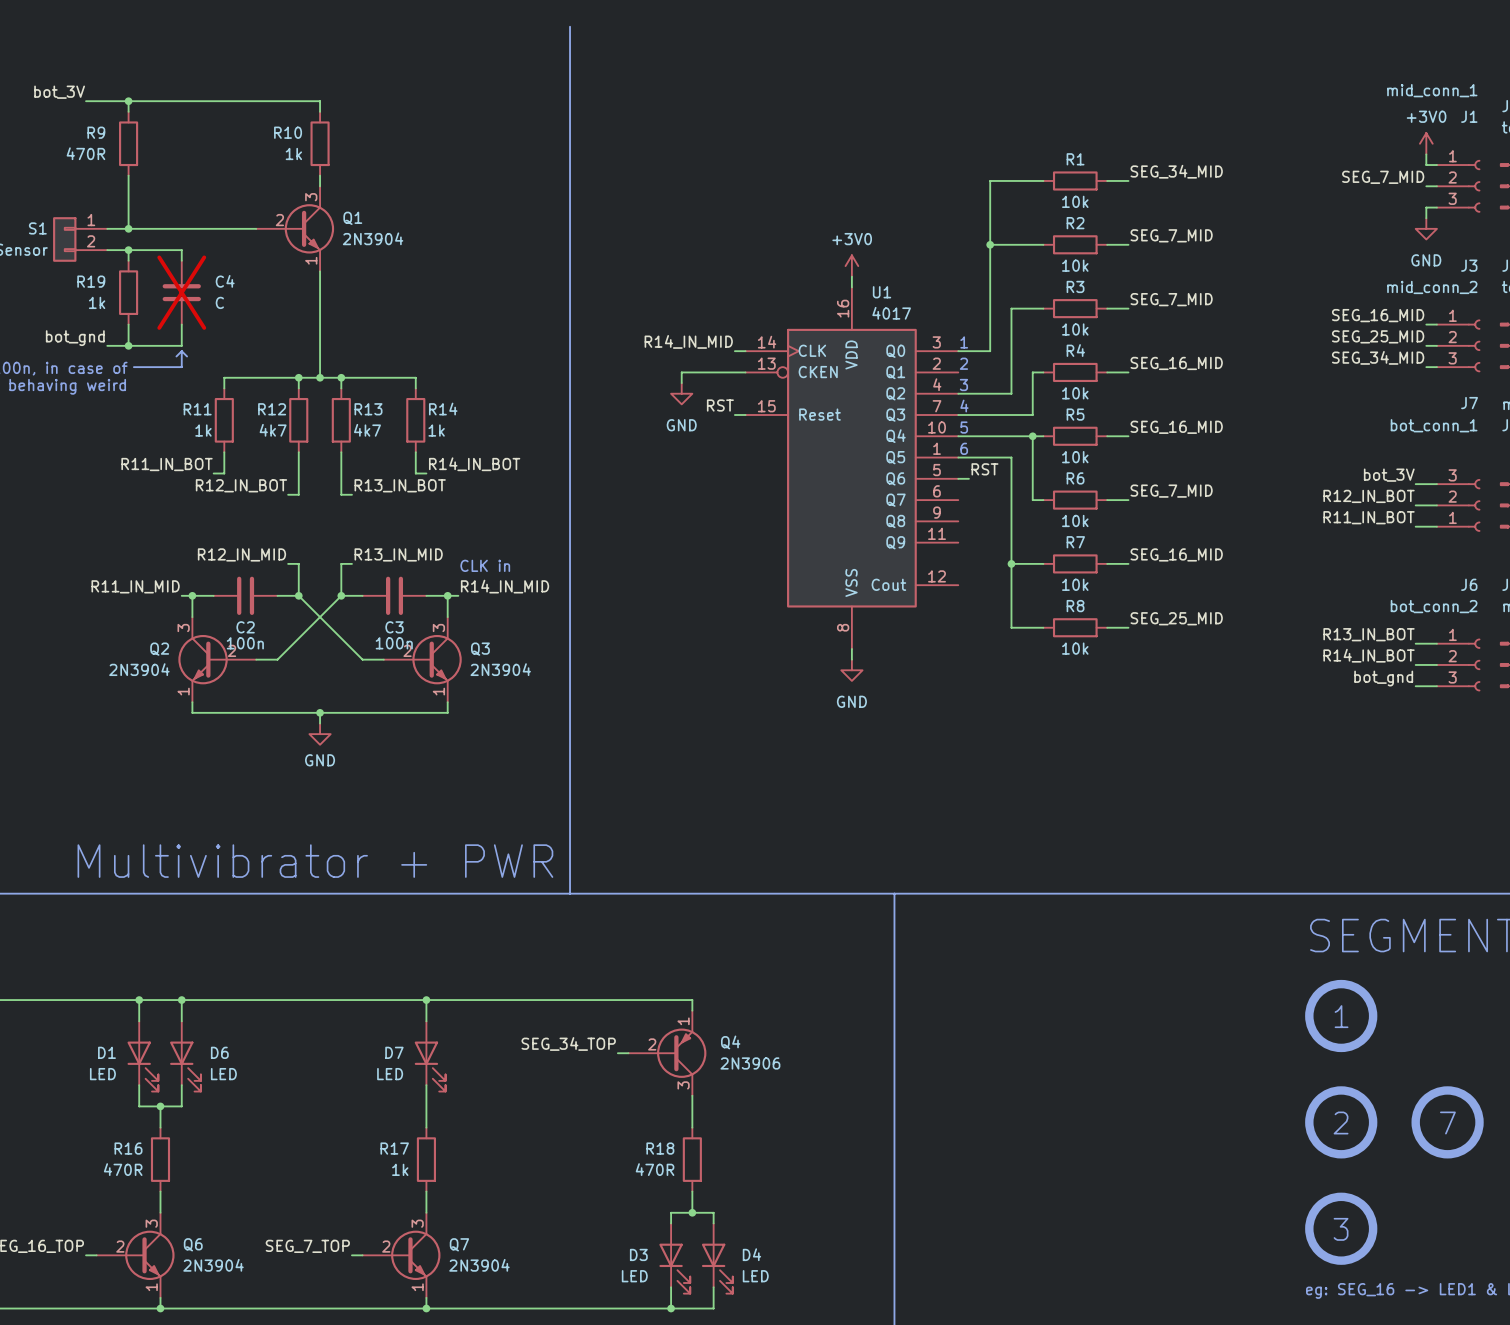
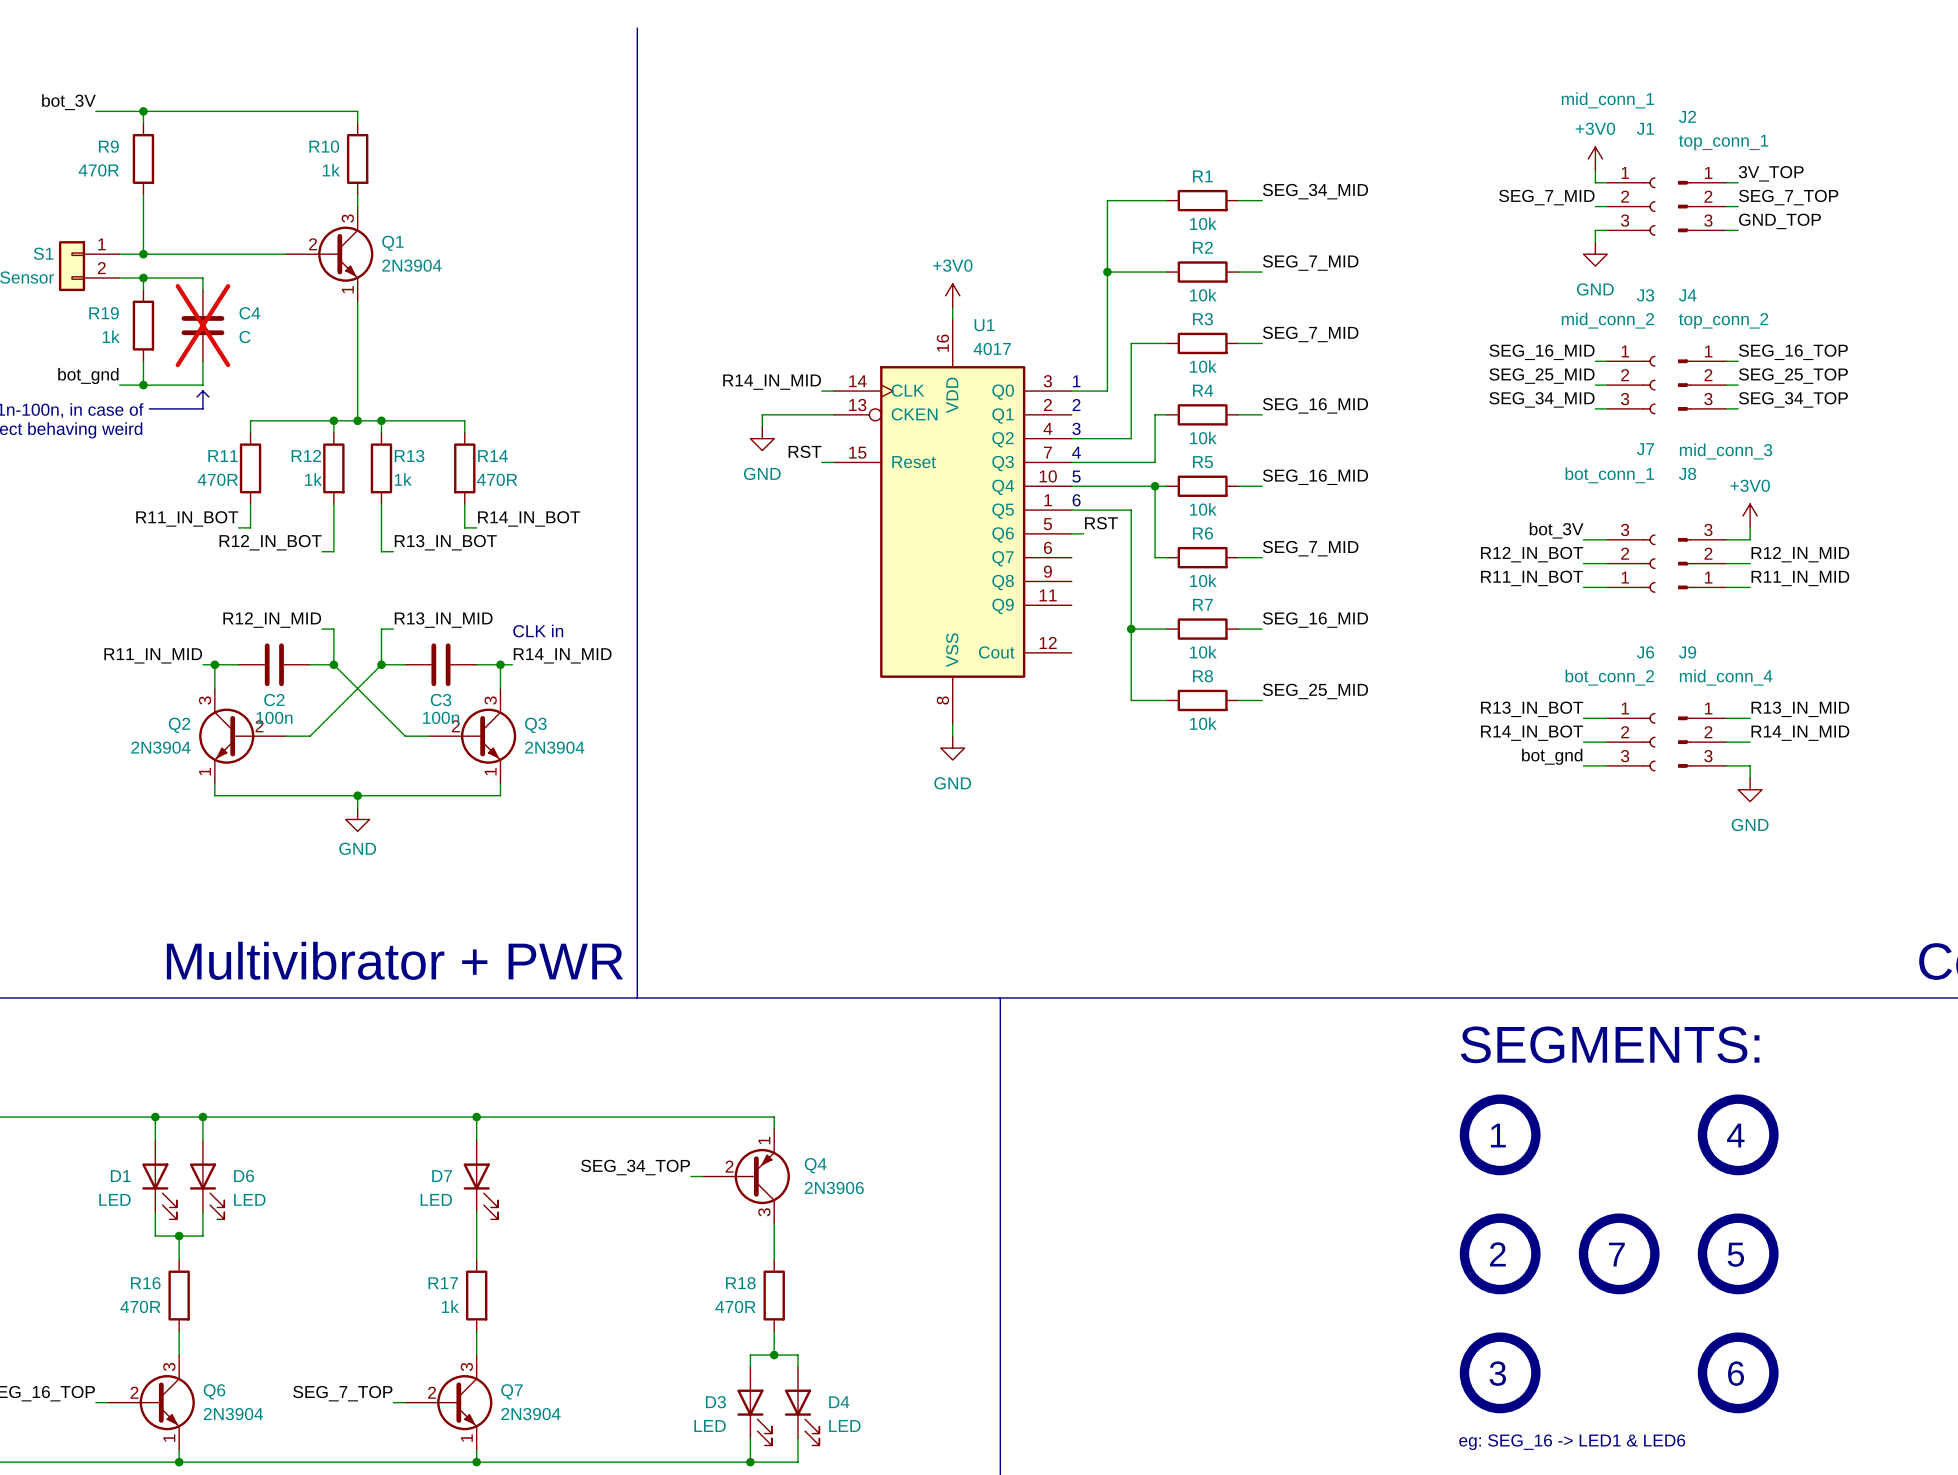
R11 value: 1k (203, 430) -> 470R (217, 479)
R12 value: 4k7 (273, 430) -> 1k (313, 479)
R13 value: 4k7 (367, 430) -> 1k (403, 479)
R14 value: 1k (436, 430) -> 470R (497, 479)

